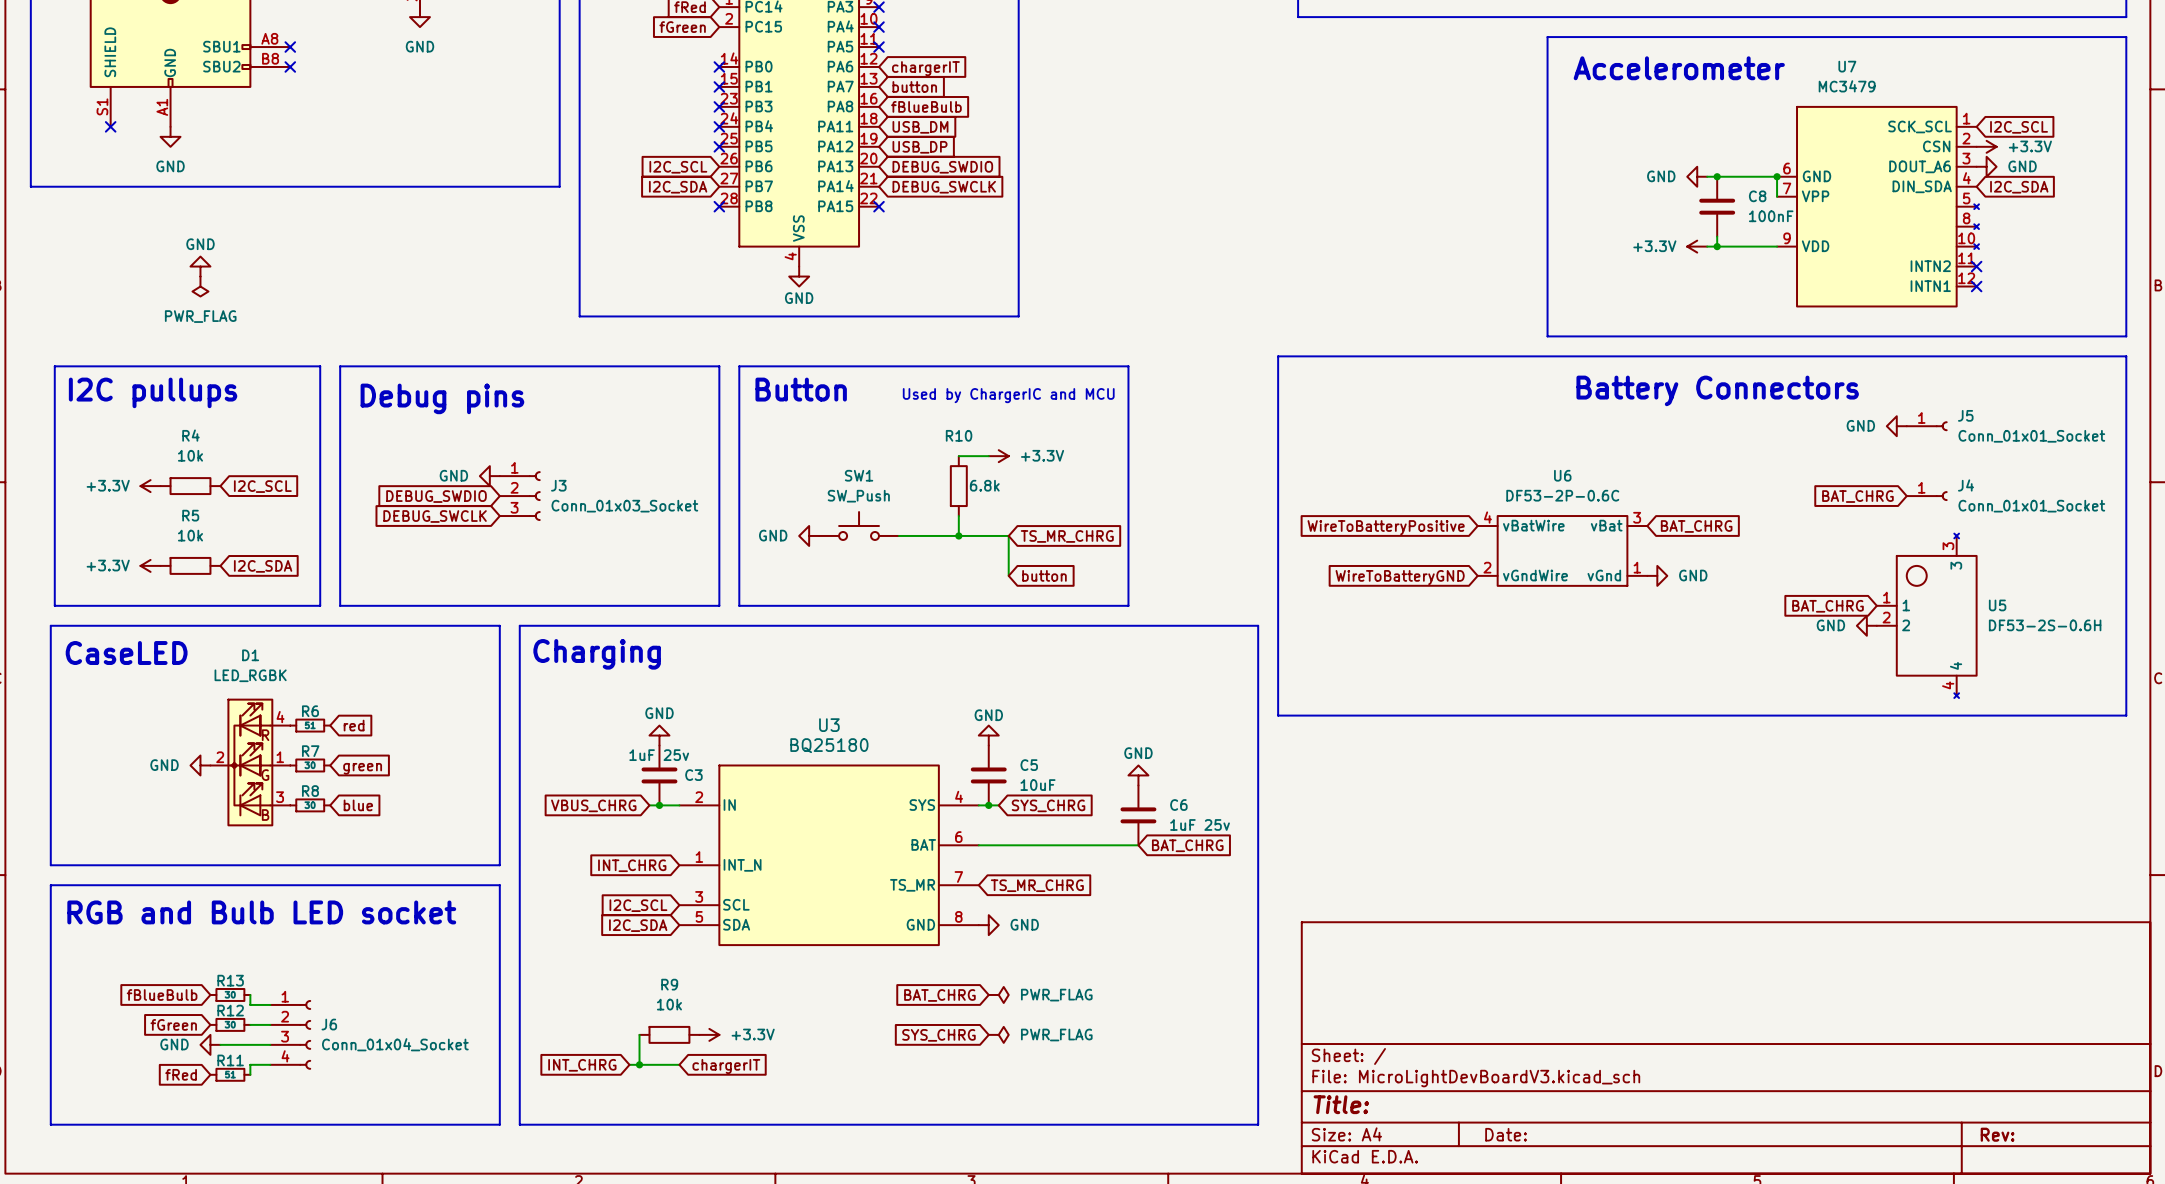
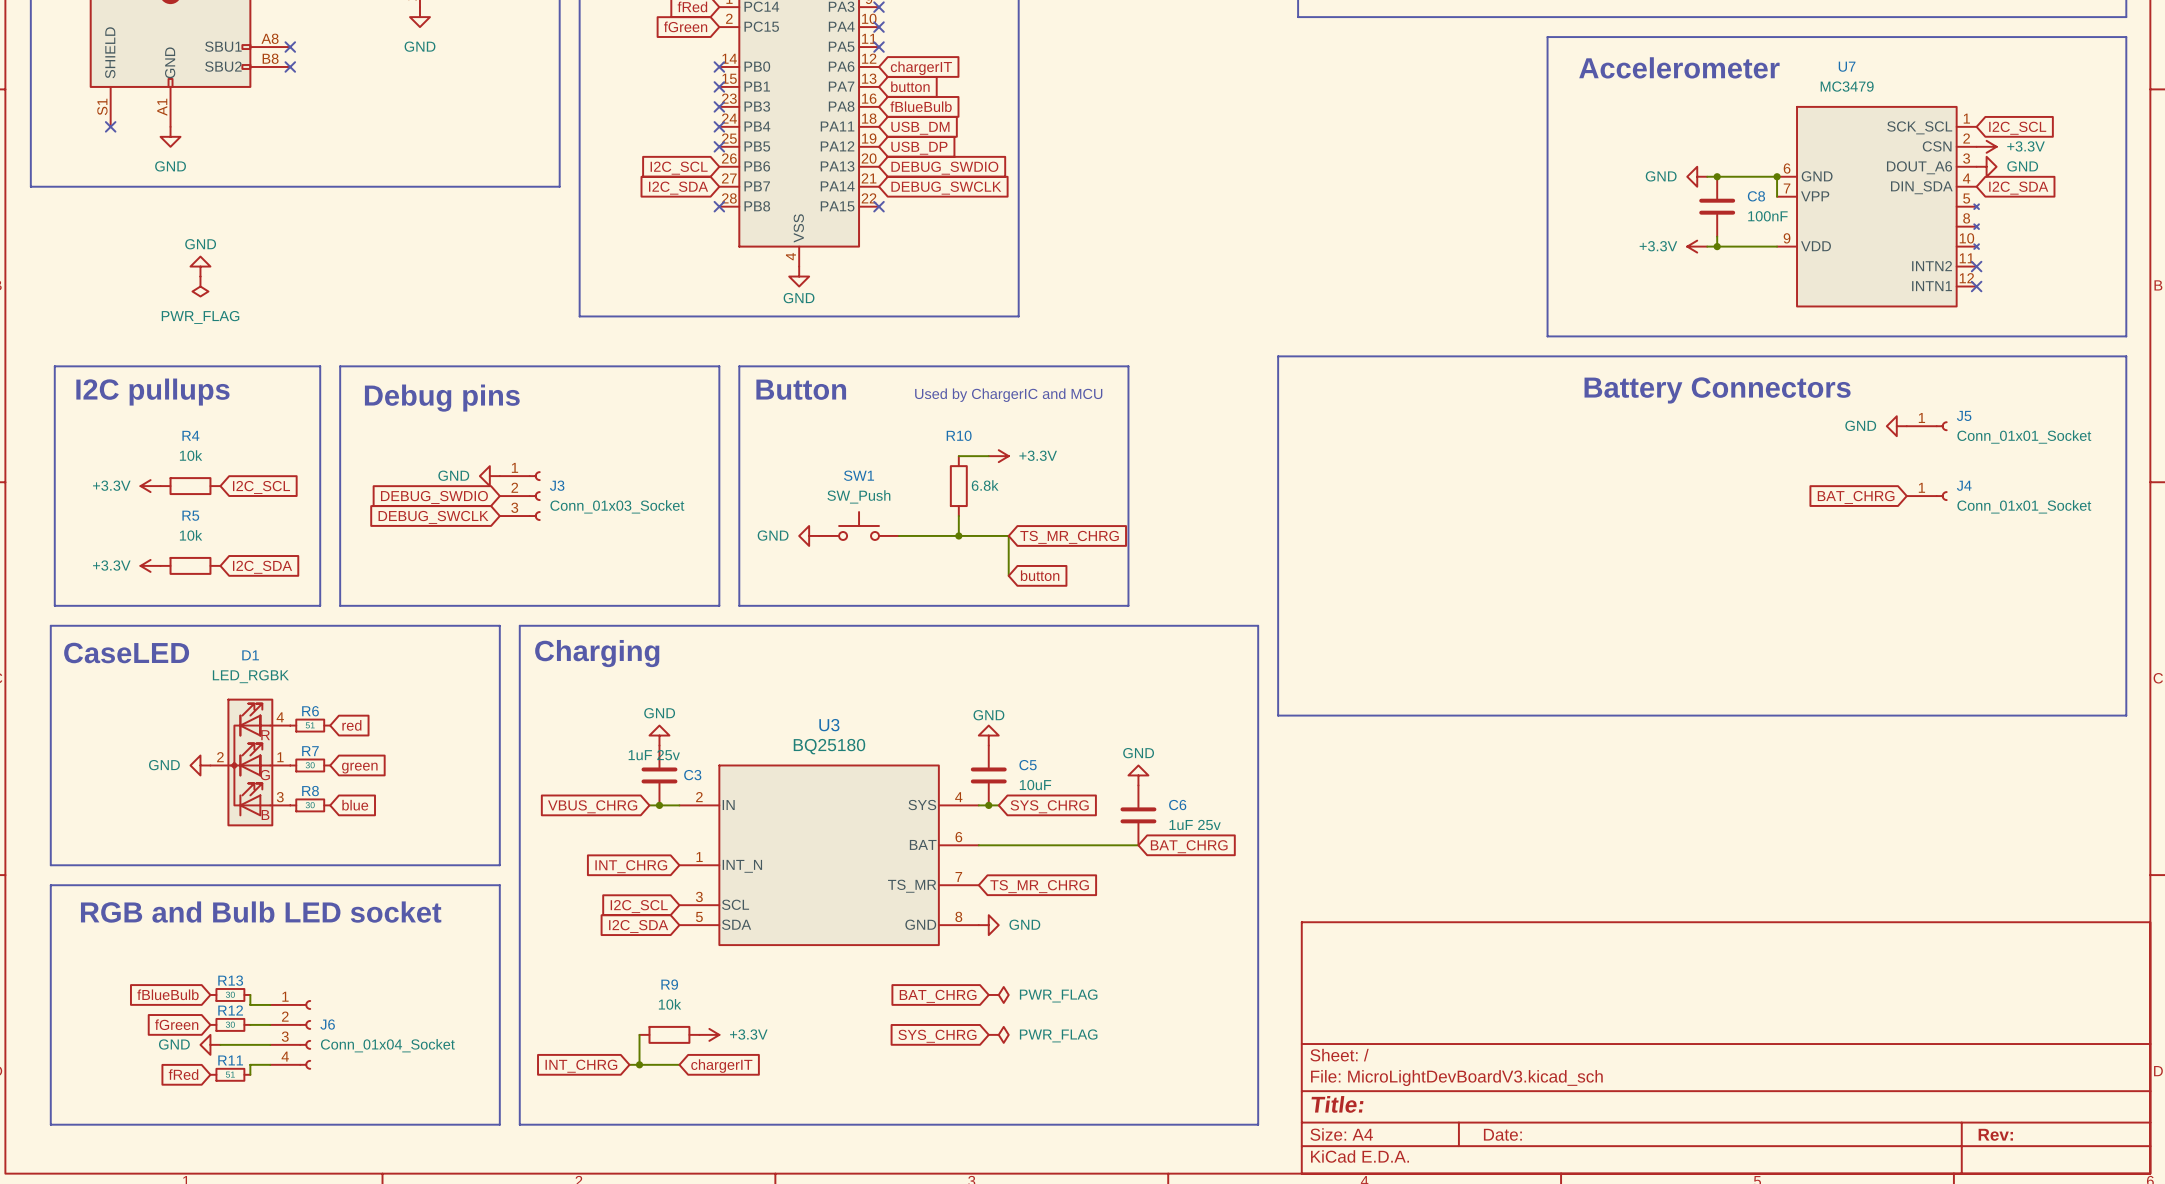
global label: BAT_CHRG (1696, 526) -> none
global label: WireToBatteryPositive (1386, 527) -> none
U6: DF53-2P-0.6C (1562, 550) -> none
power symbol: GND (1657, 575) -> none
global label: WireToBatteryGND (1400, 577) -> none
global label: BAT_CHRG (1828, 606) -> none
U5: DF53-2S-0.6H (1926, 615) -> none
power symbol: GND (1866, 625) -> none

